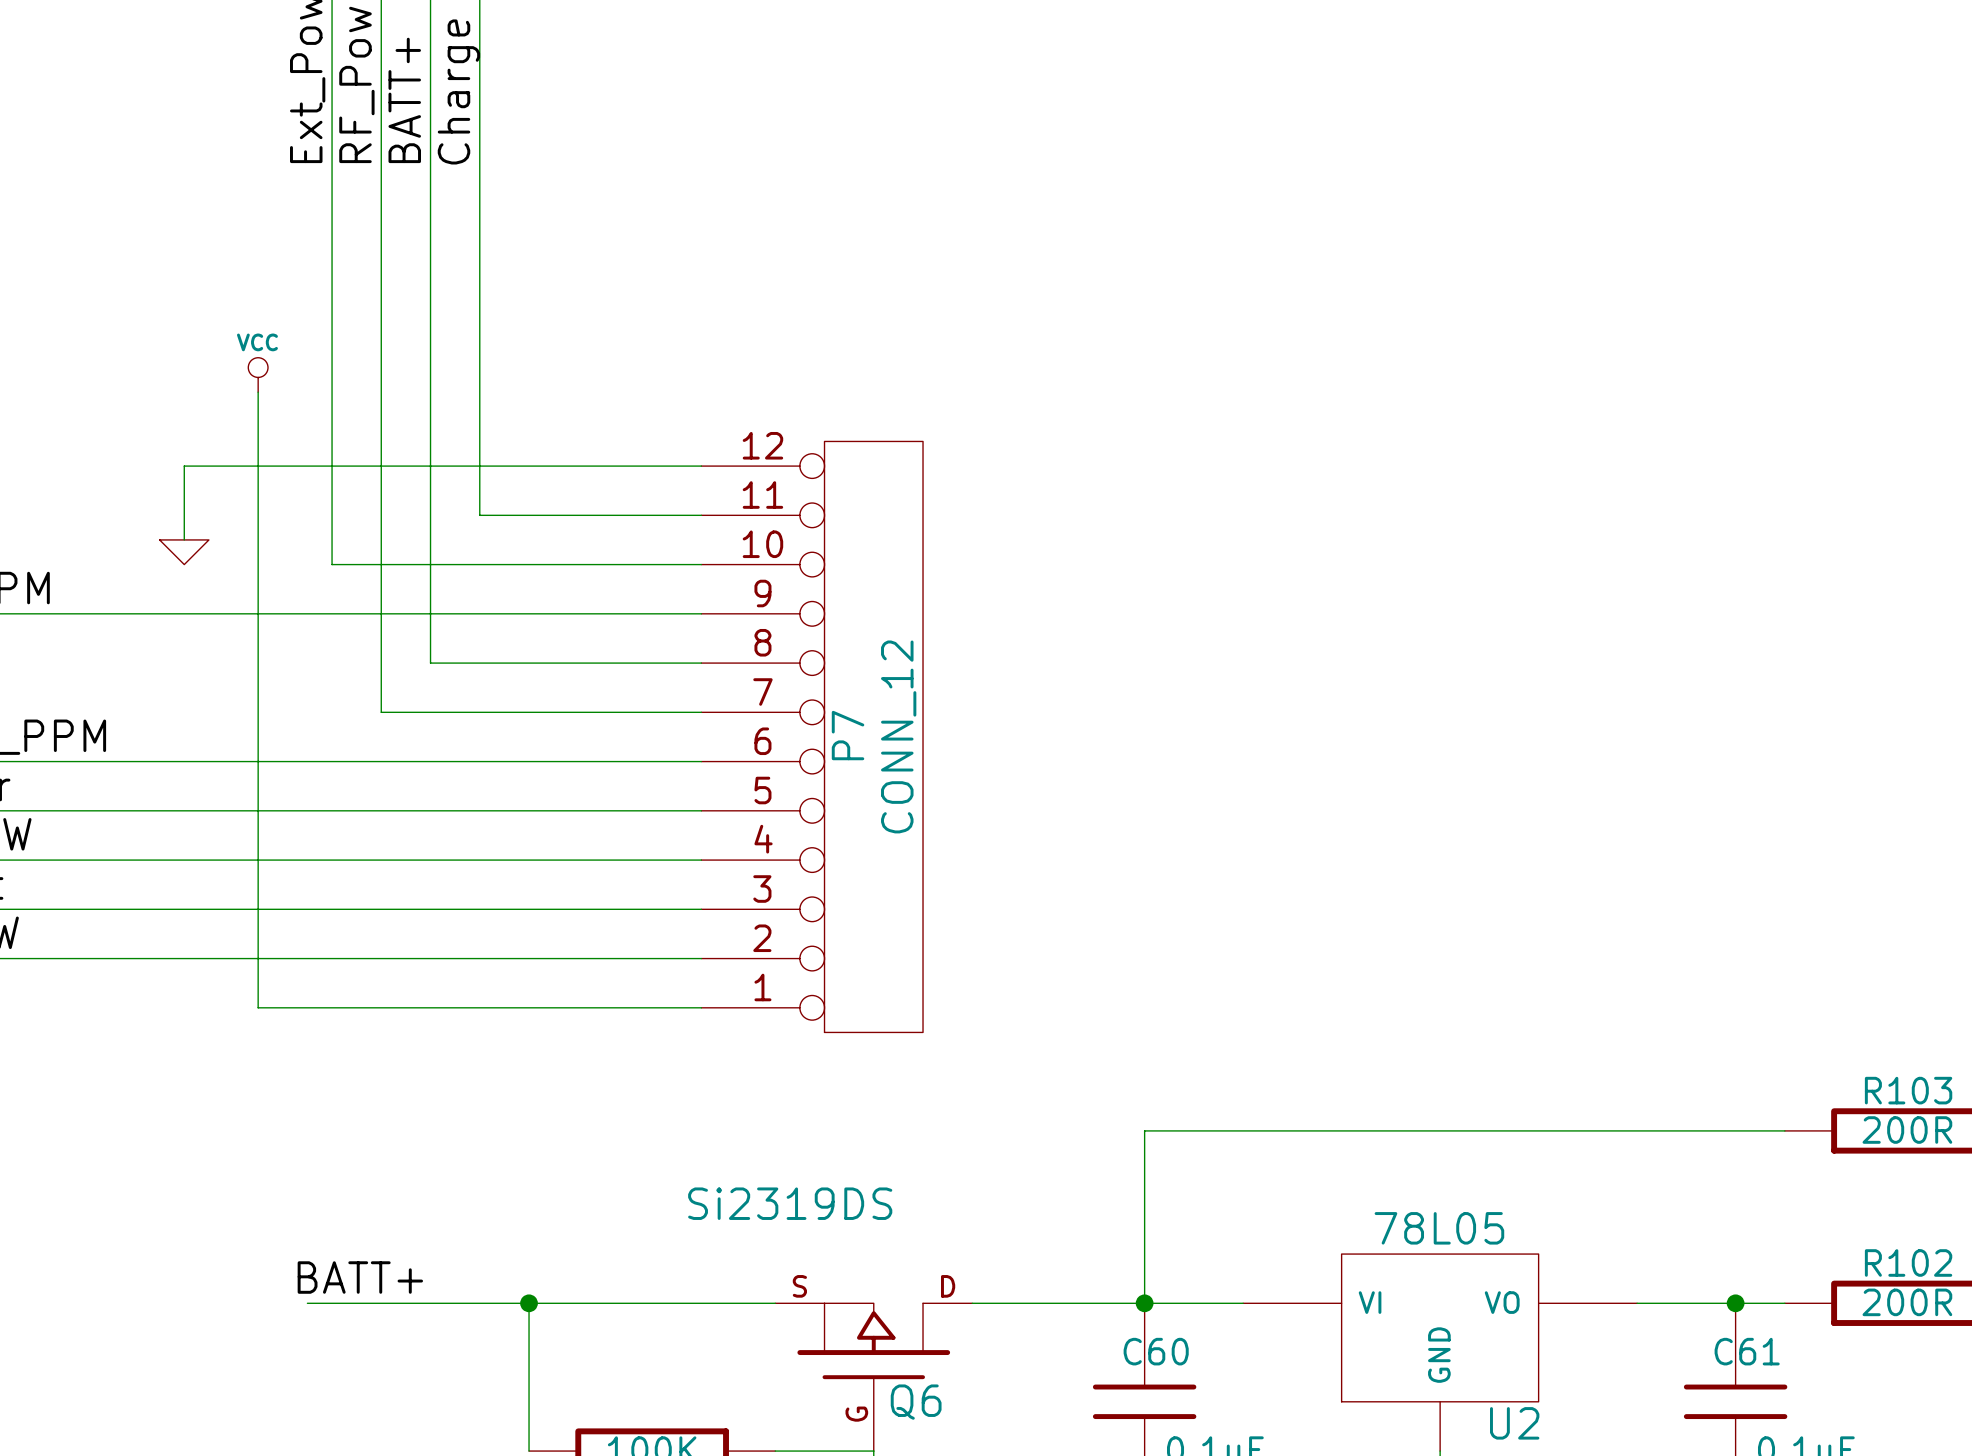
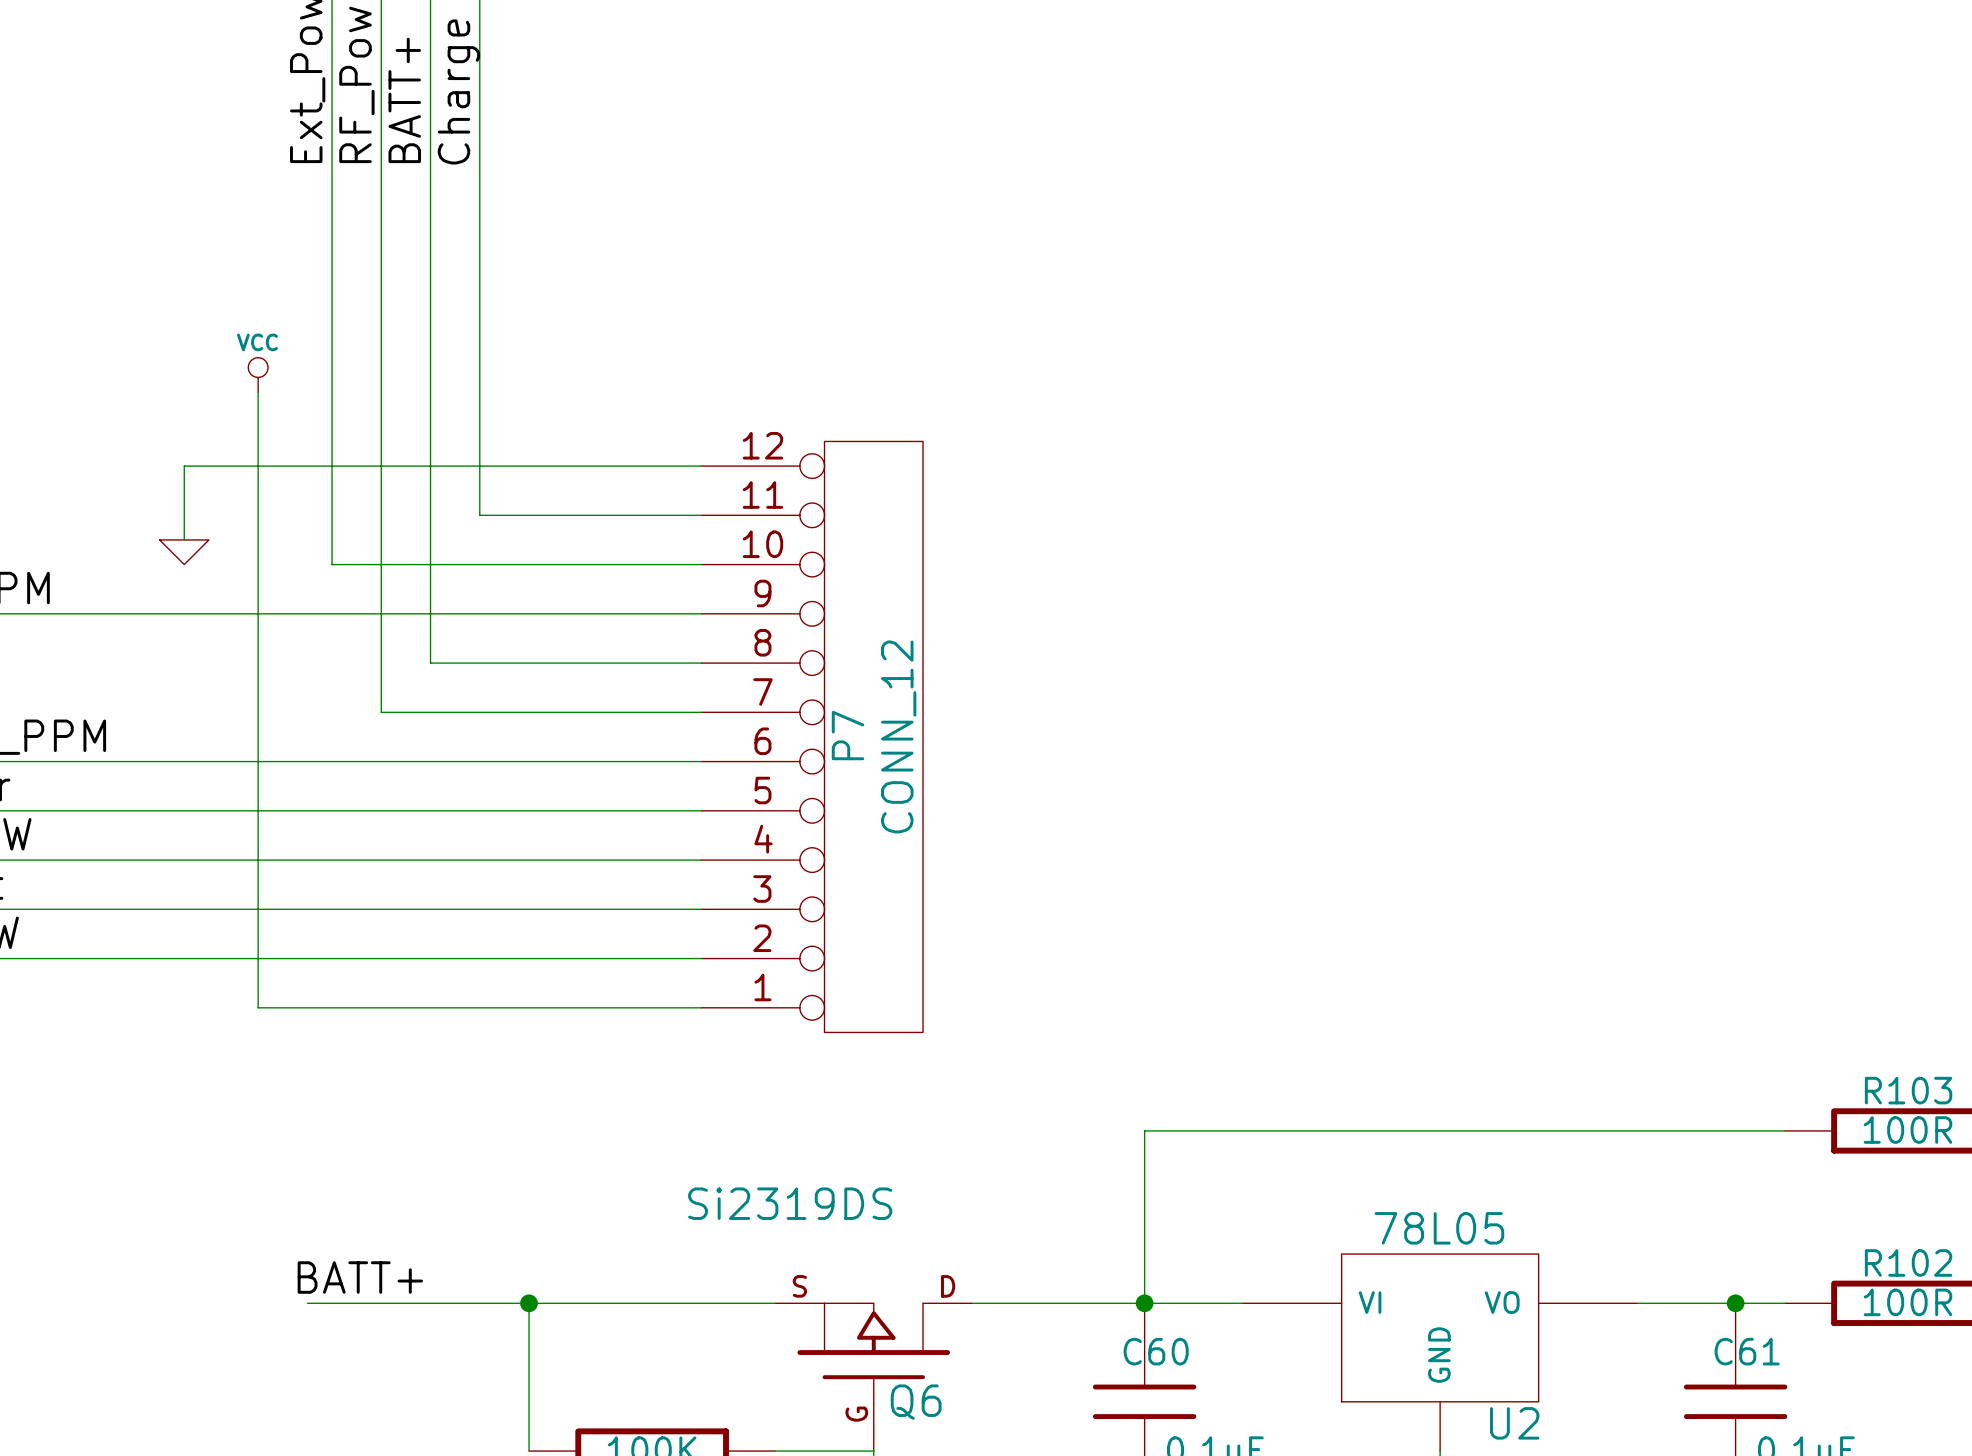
R103 value: 200R (1907, 1130) -> 100R (1907, 1130)
R102 value: 200R (1907, 1302) -> 100R (1907, 1302)

